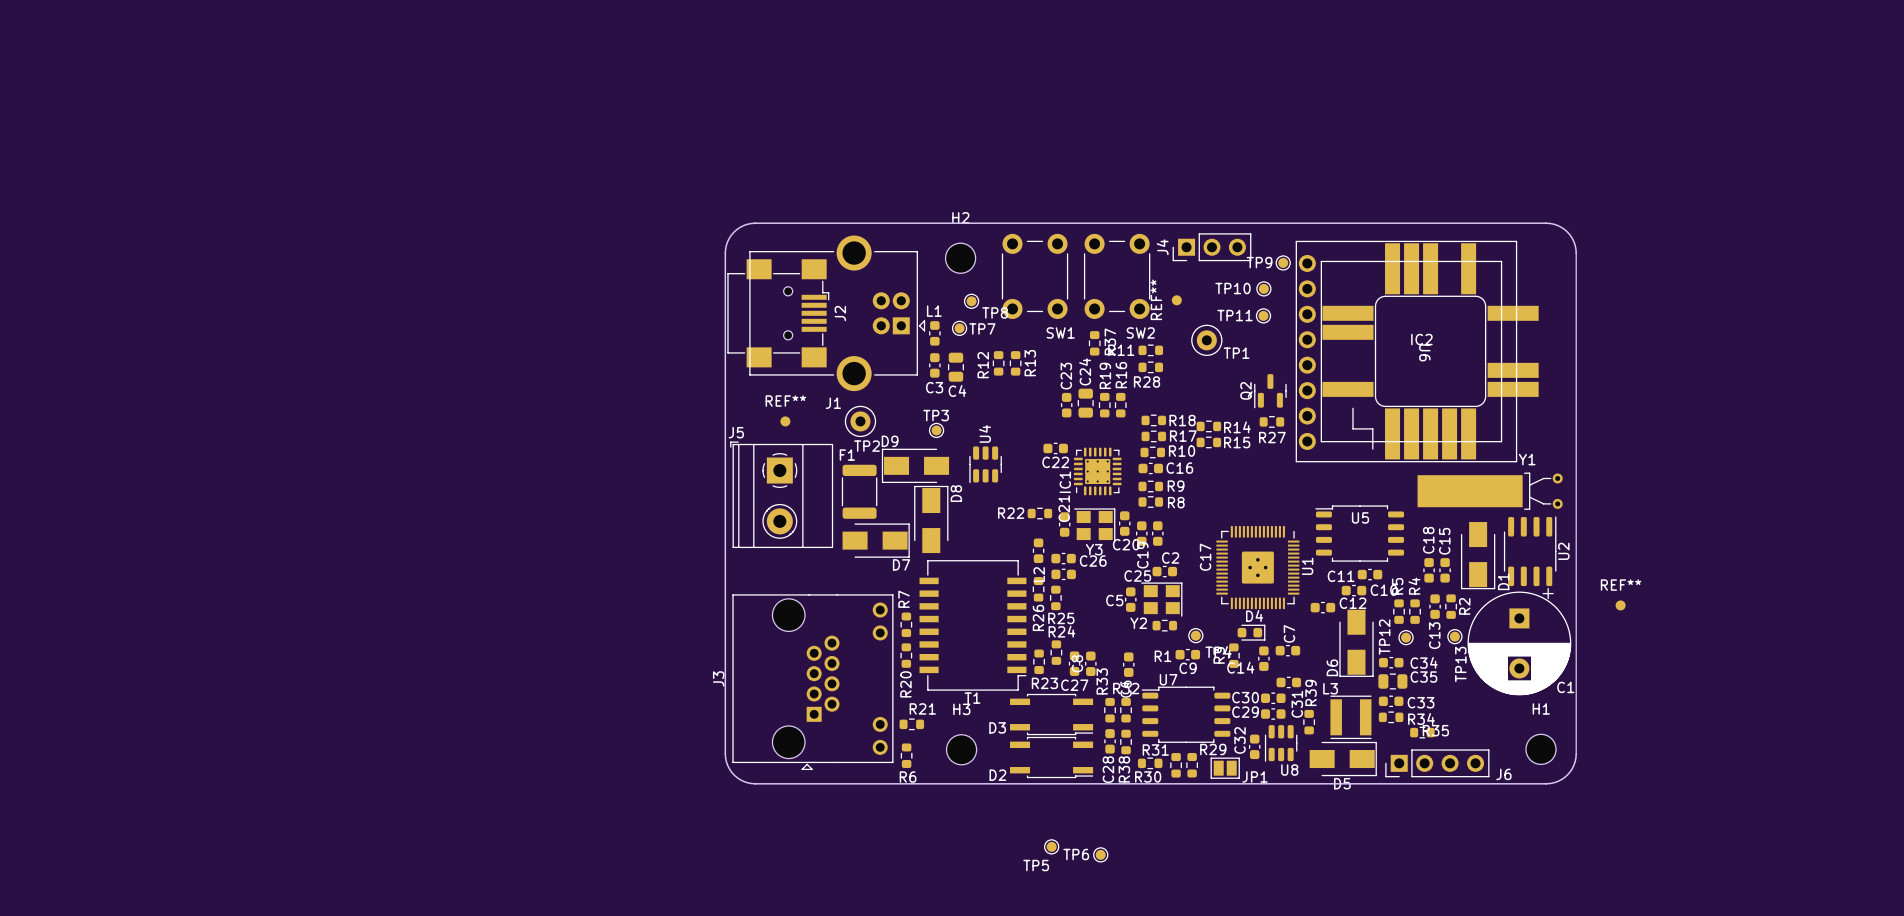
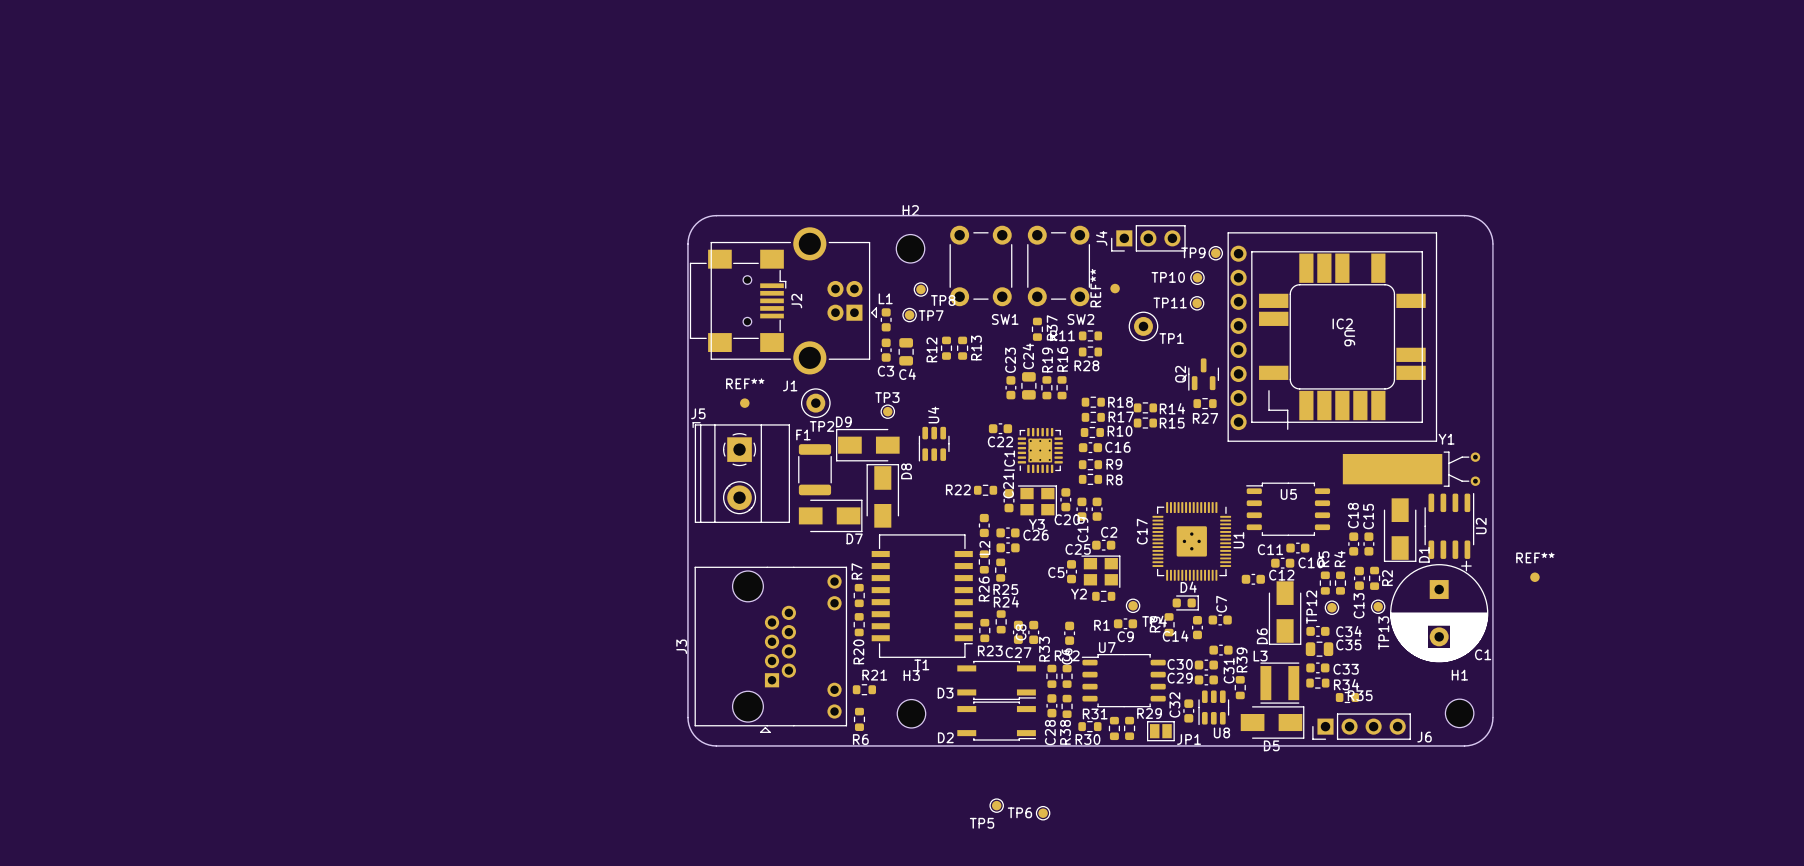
IC2 footprint: [1322, 243, 1539, 460] -> [1259, 253, 1426, 430]

